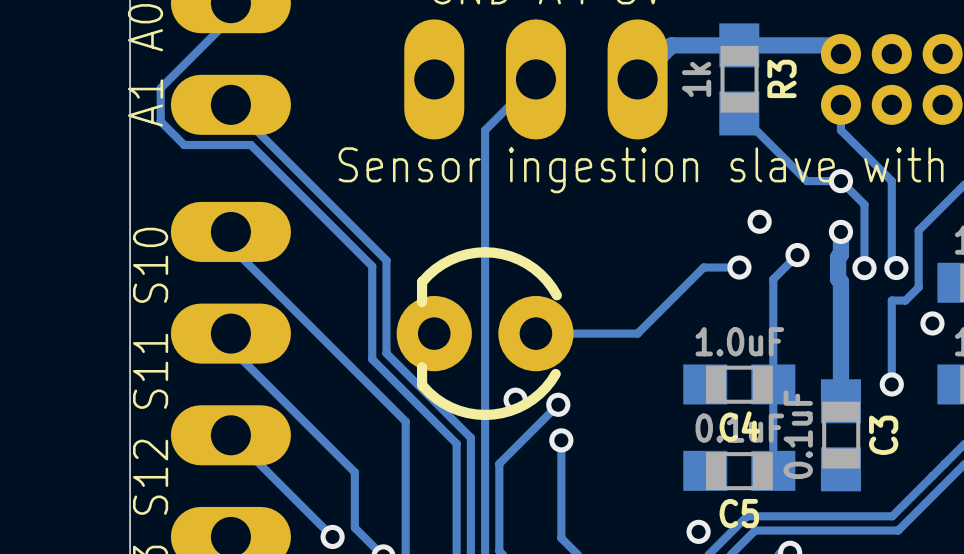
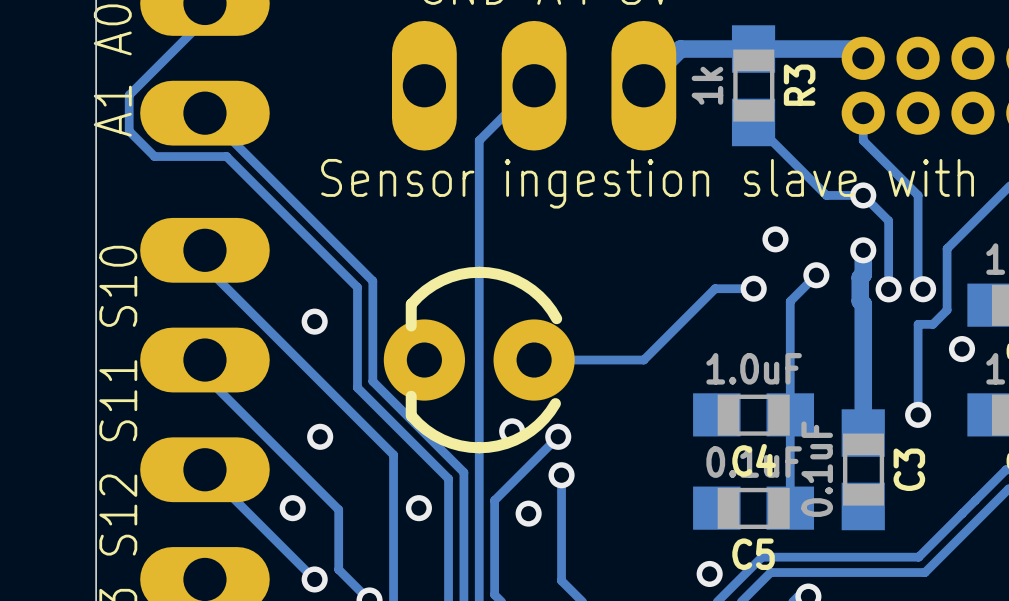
via: none -> (314, 321)
via: none -> (320, 436)
via: none -> (292, 508)
via: none -> (418, 508)
via: none -> (528, 513)

